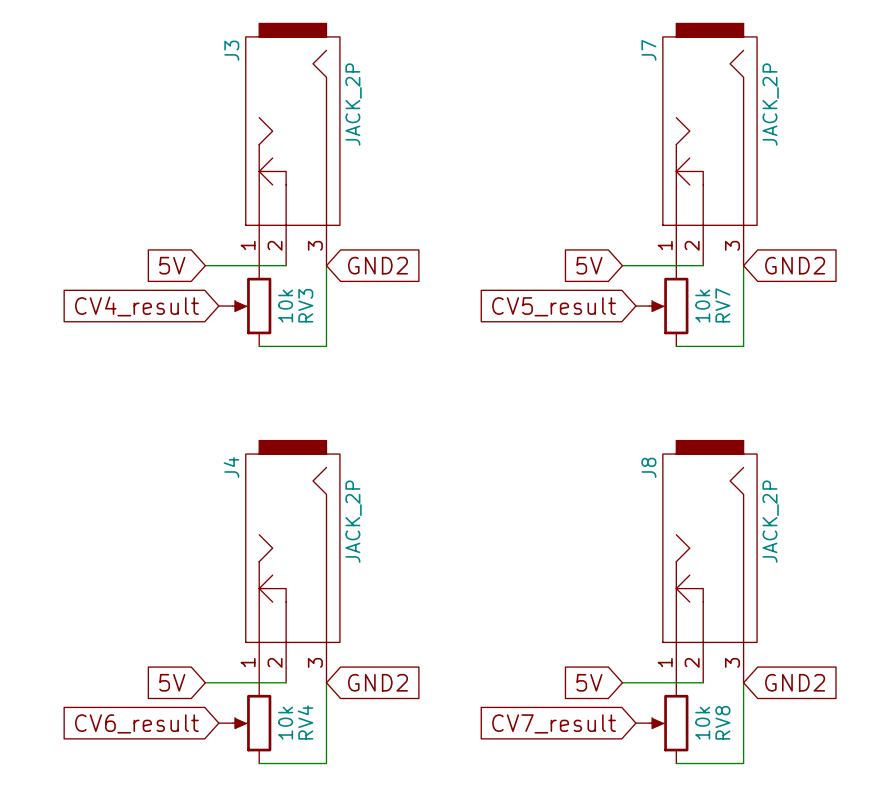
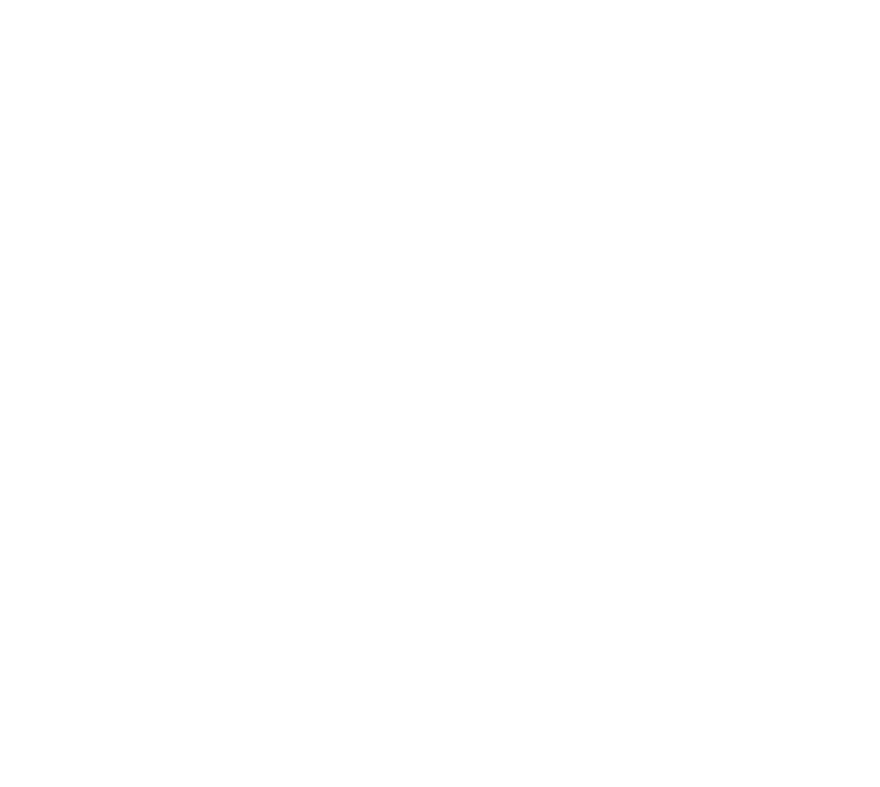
J3: JACK_2P (292, 144) -> none
J7: JACK_2P (709, 144) -> none
global label: 5V (172, 265) -> none
wire: (205, 265) (286, 265) -> none
wire: (326, 265) (326, 346) (259, 346) -> none
global label: GND2 (378, 265) -> none
global label: 5V (589, 265) -> none
wire: (622, 265) (703, 265) -> none
wire: (743, 265) (743, 346) (676, 346) -> none
global label: GND2 (795, 265) -> none
global label: CV4_result (136, 306) -> none
RV3: 10k (245, 306) -> none
global label: CV5_result (554, 306) -> none
RV7: 10k (662, 306) -> none
J4: JACK_2P (292, 561) -> none
J8: JACK_2P (709, 561) -> none
global label: 5V (172, 682) -> none
wire: (205, 682) (286, 682) -> none
wire: (326, 682) (326, 763) (259, 763) -> none
global label: GND2 (378, 682) -> none
global label: 5V (589, 682) -> none
wire: (622, 682) (703, 682) -> none
wire: (743, 682) (743, 763) (676, 763) -> none
global label: GND2 (795, 682) -> none
global label: CV6_result (136, 723) -> none
RV4: 10k (245, 723) -> none
global label: CV7_result (554, 723) -> none
RV8: 10k (662, 723) -> none

